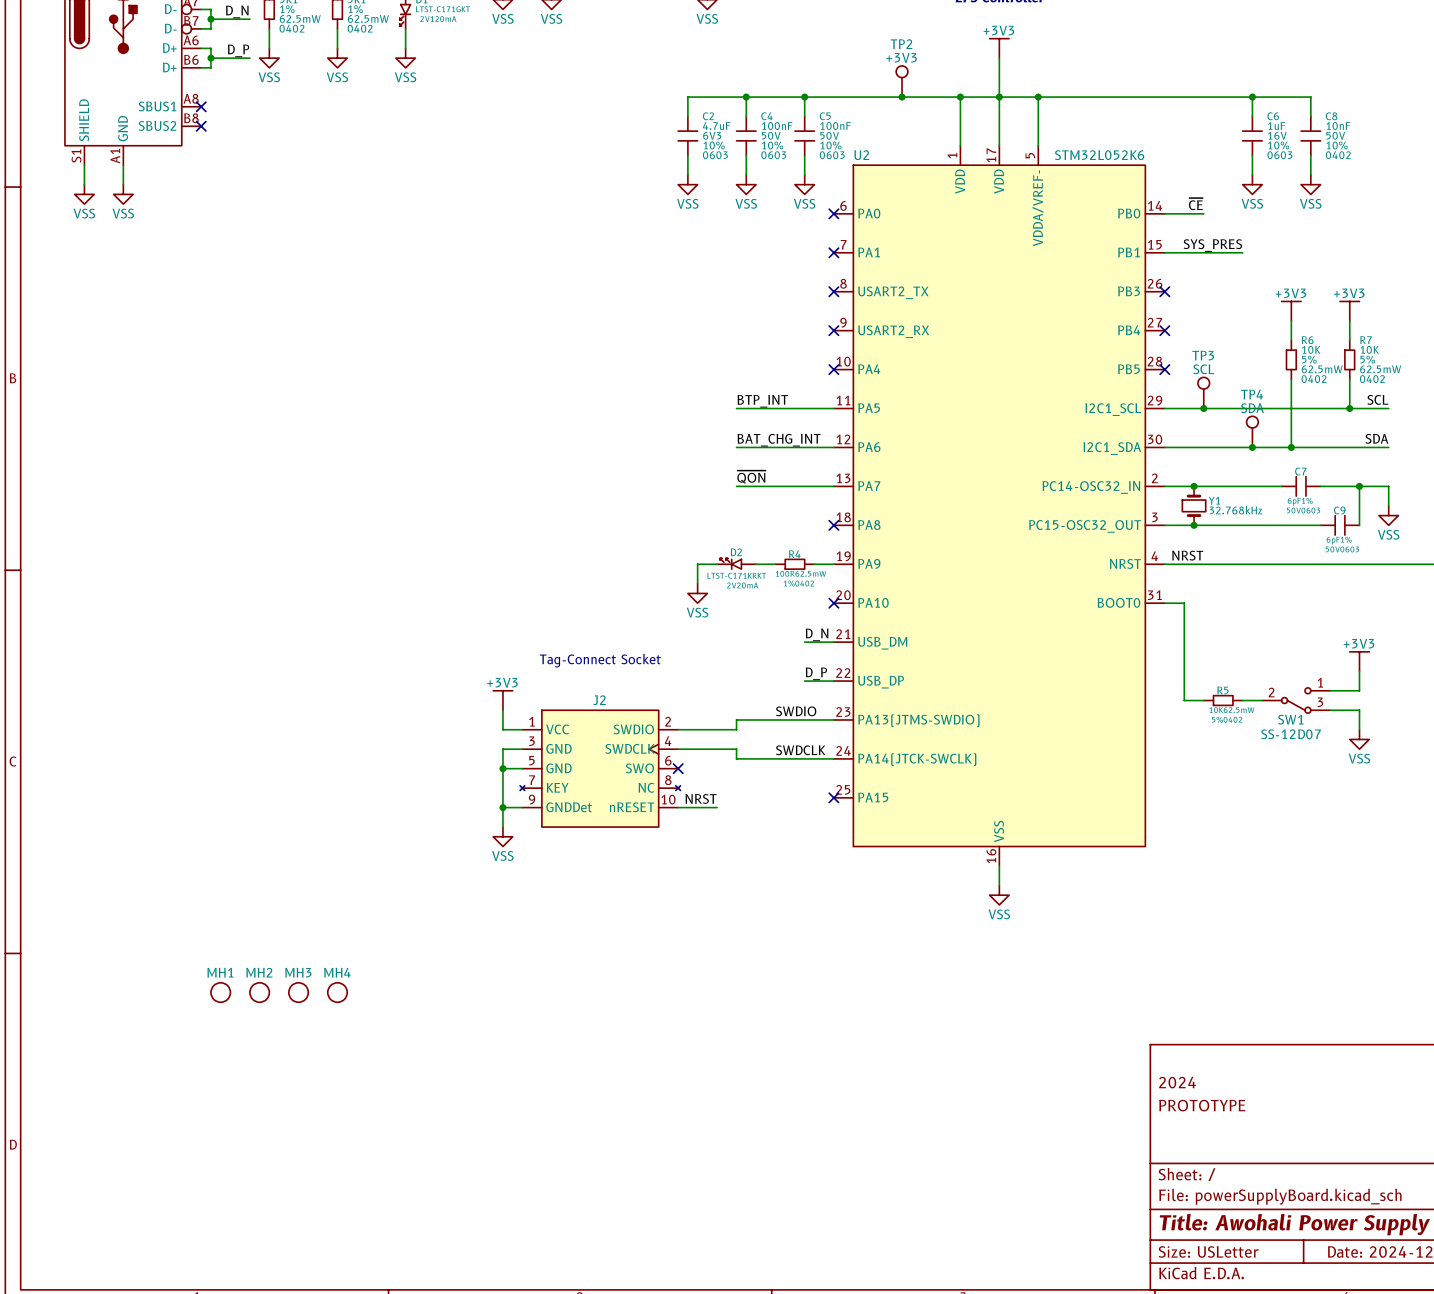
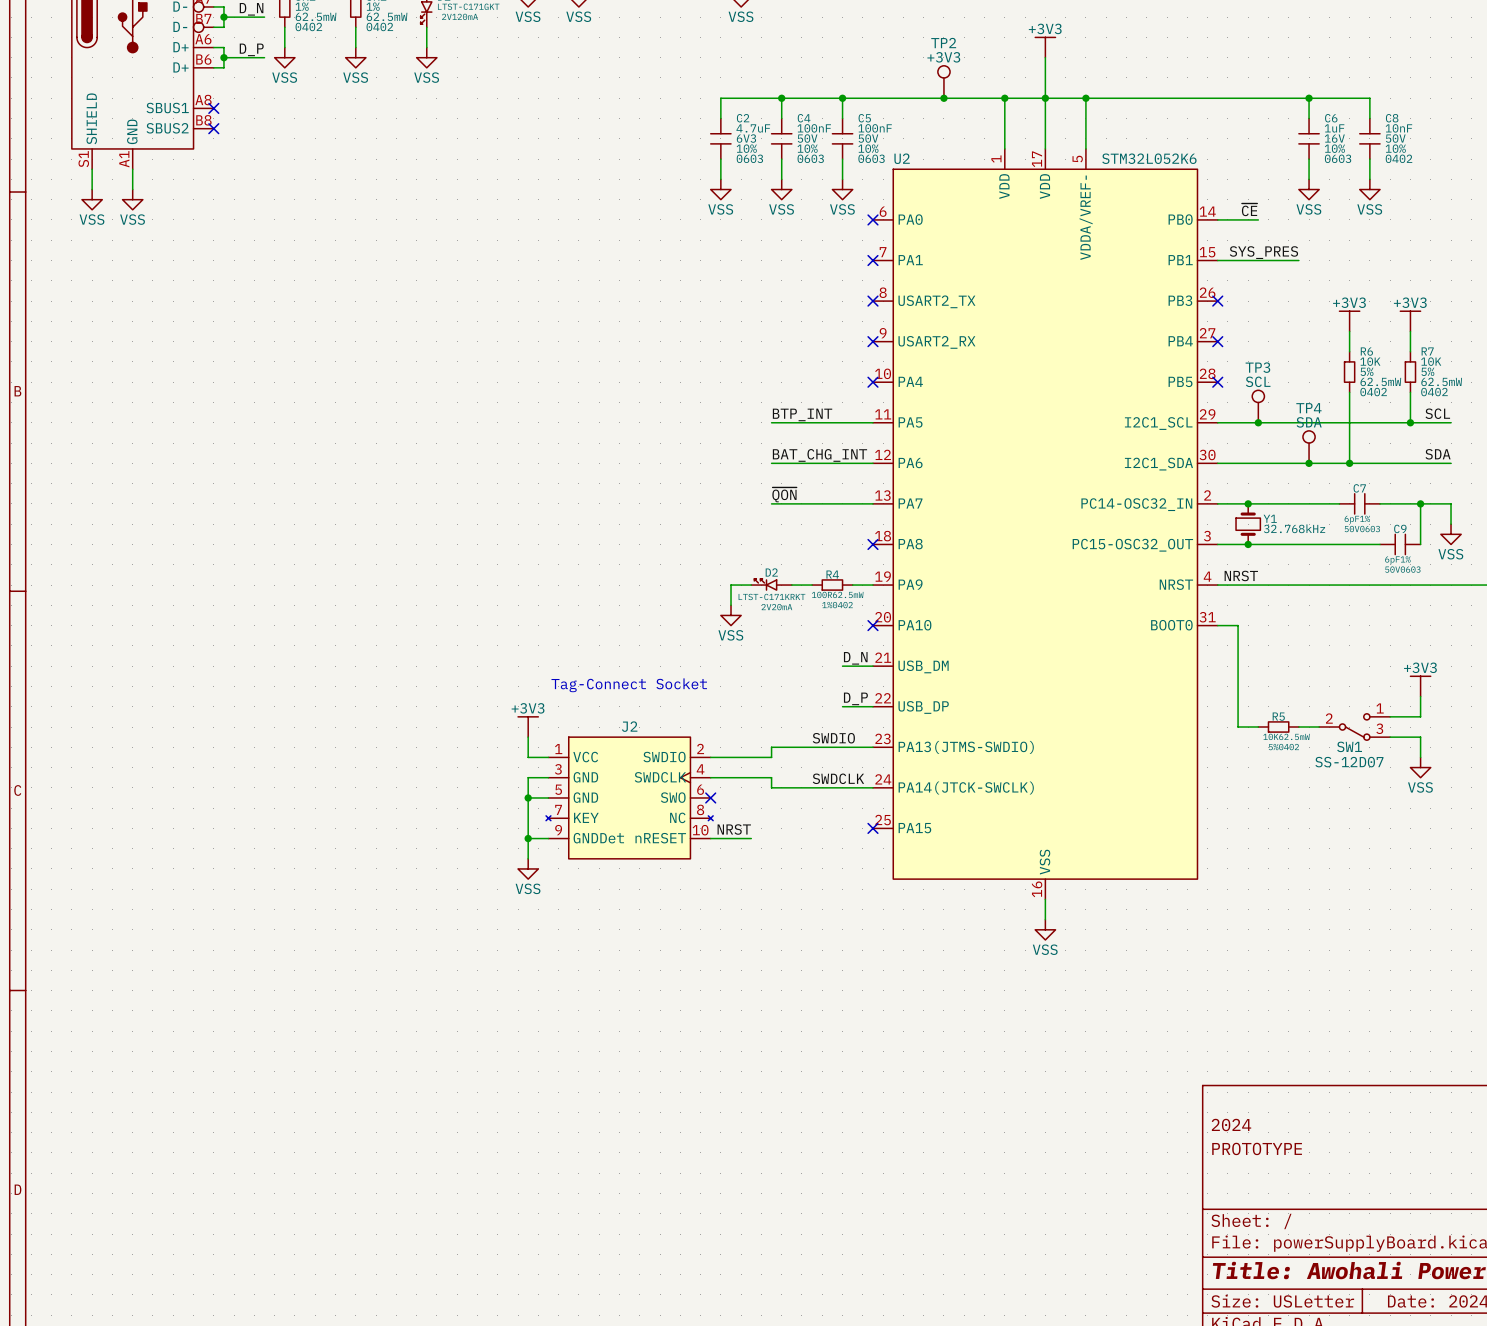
MH1: (220, 992) -> none
MH2: (259, 992) -> none
MH3: (298, 992) -> none
MH4: (337, 992) -> none

